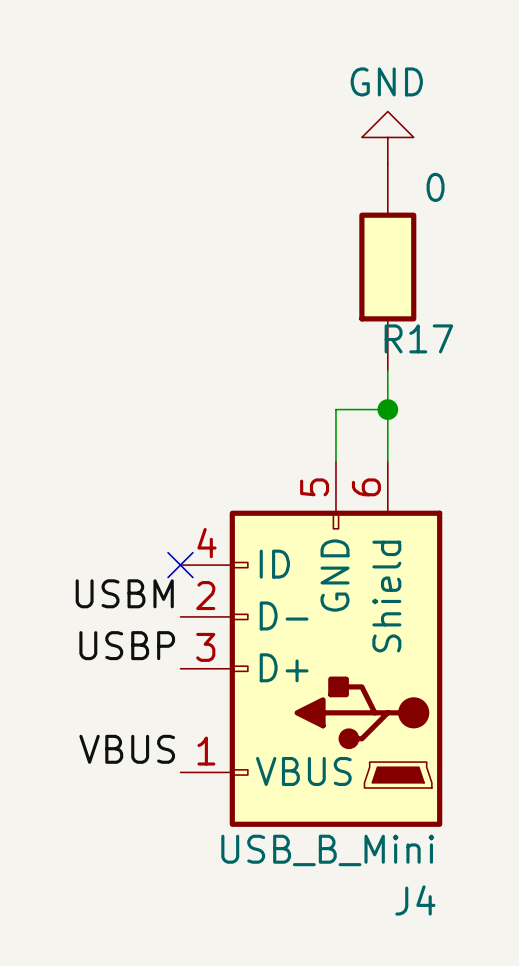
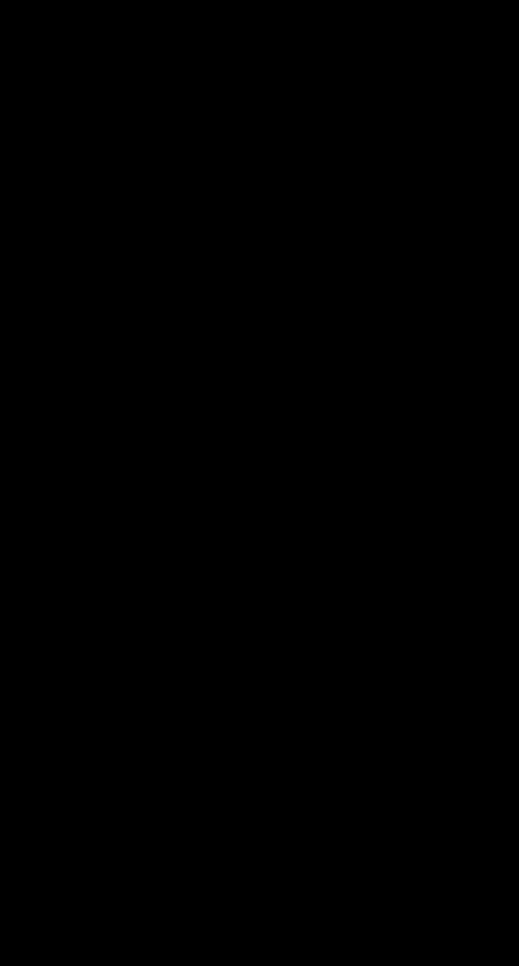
power symbol: GND (387, 137) -> none
R17: 0 (387, 267) -> none
wire: (387, 370) (387, 461) -> none
wire: (387, 409) (335, 409) (335, 461) -> none
junction: (387, 409) -> none
no-connect mark: (180, 565) -> none
label: USBM (124, 593) -> none
J4: USB_B_Mini (311, 644) -> none
label: USBP (127, 645) -> none
label: VBUS (127, 749) -> none

